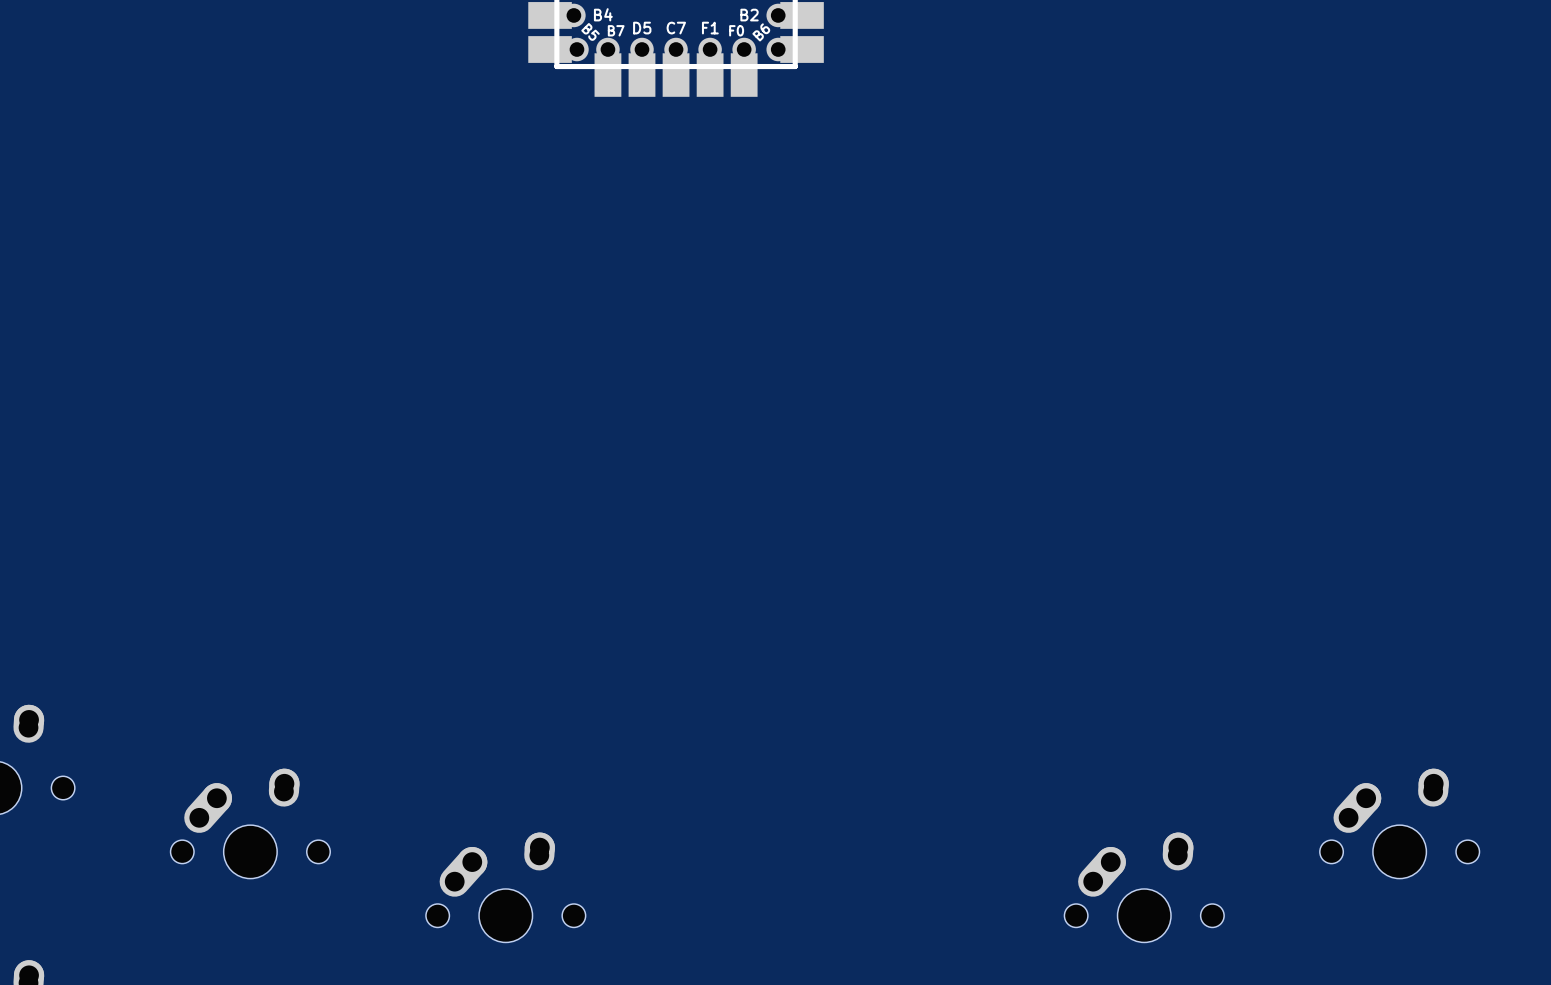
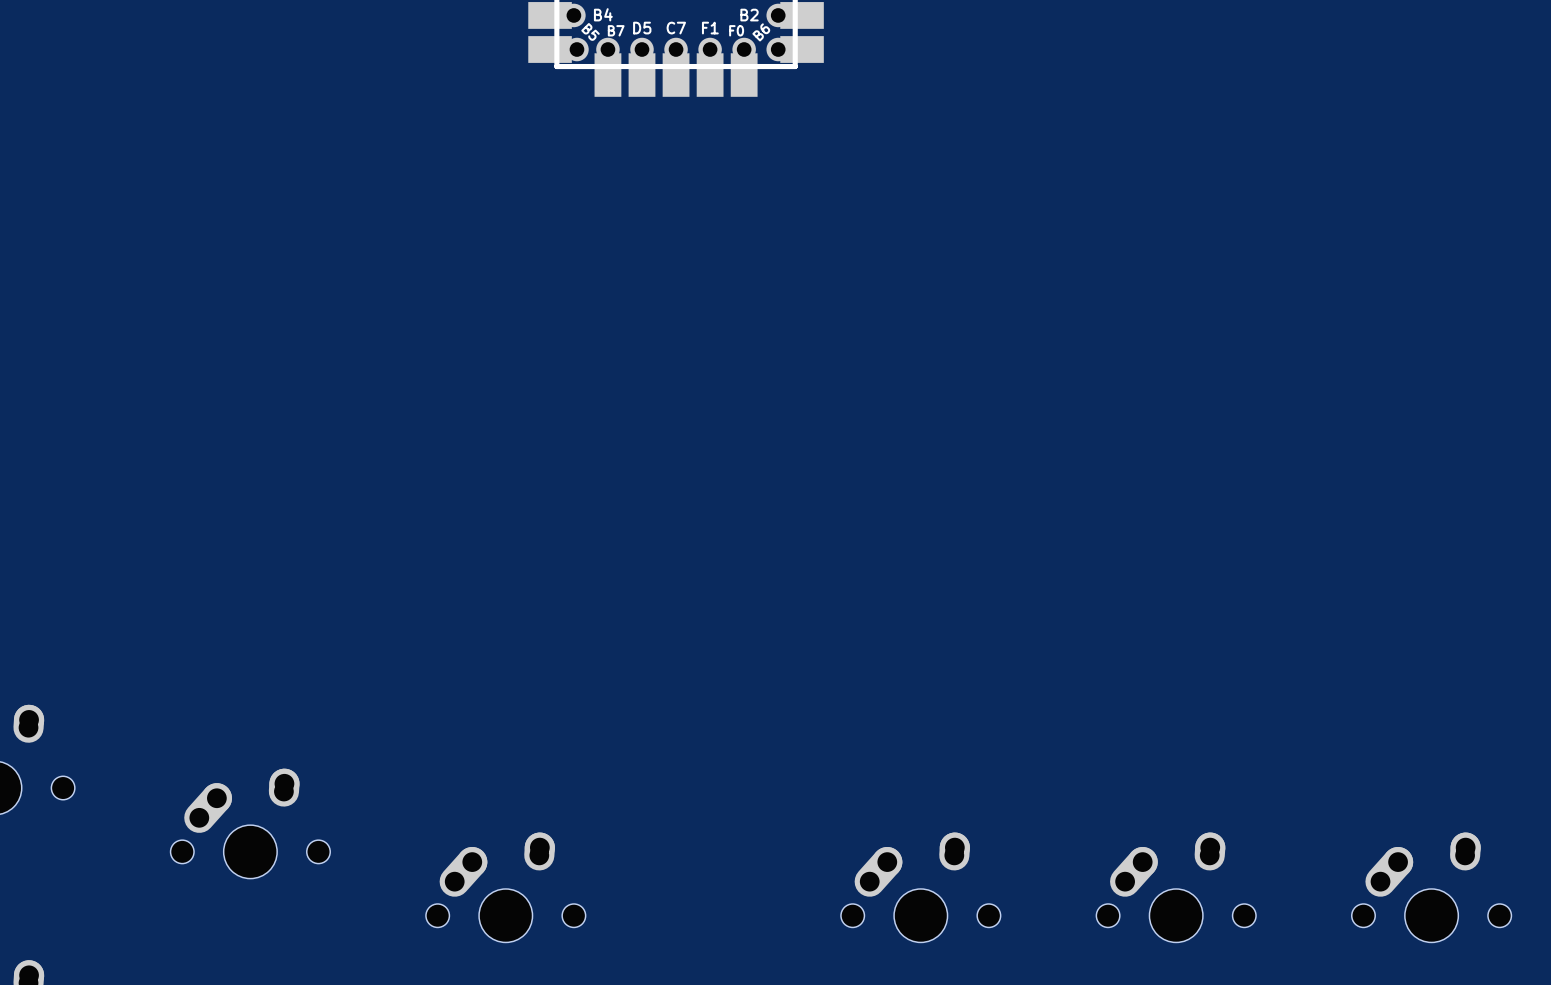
part position: (1399, 823) -> (1431, 887)
part: none -> (920, 887)
part position: (1144, 887) -> (1176, 887)

